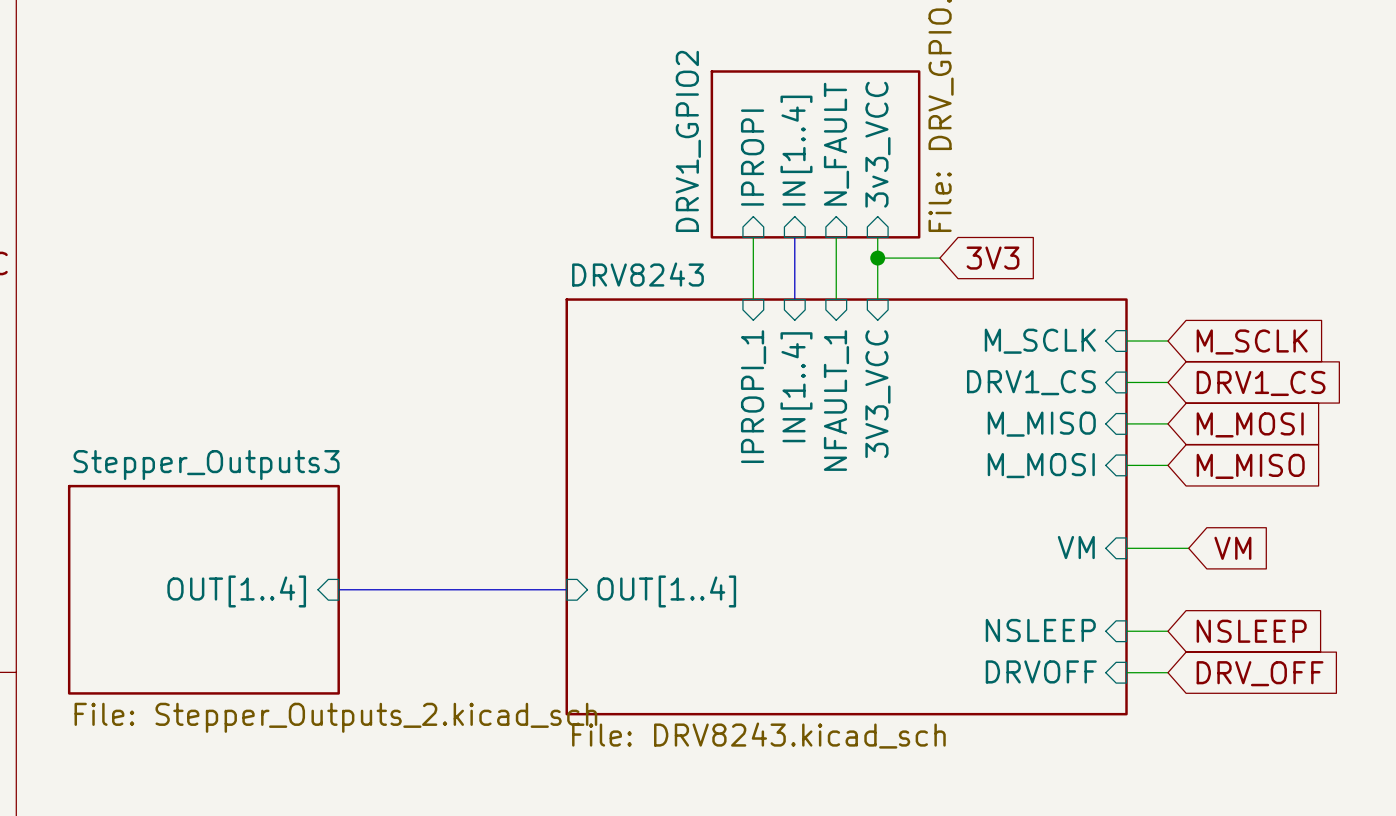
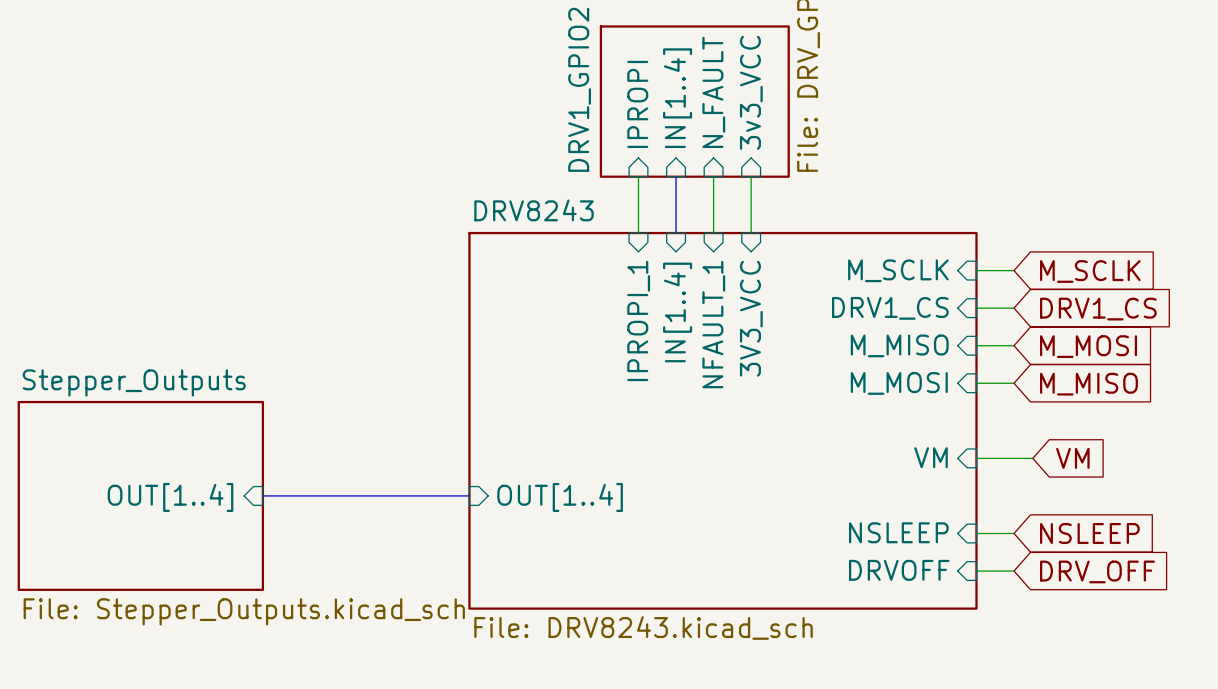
wire: (877, 258) (939, 258) -> none
junction: (877, 258) -> none
global label: 3V3 (993, 258) -> none
sheet Stepper_Outputs3 name: Stepper_Outputs3 (206, 465) -> Stepper_Outputs (134, 382)
sheet Stepper_Outputs3 value: File: Stepper_Outputs_2.kicad_sch (335, 717) -> File: Stepper_Outputs.kicad_sch (244, 611)

